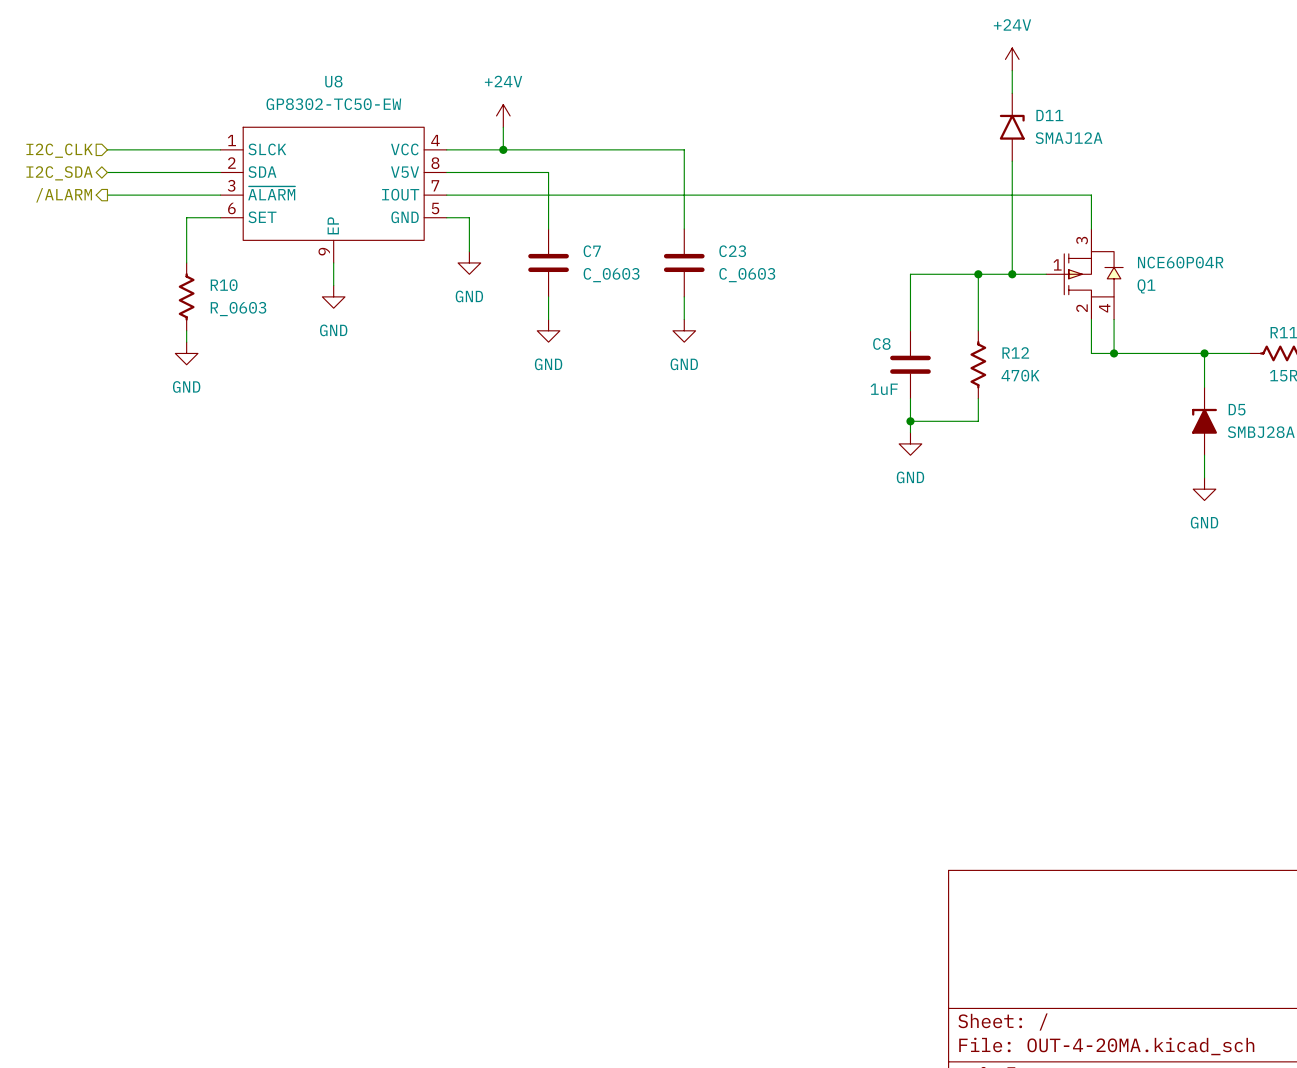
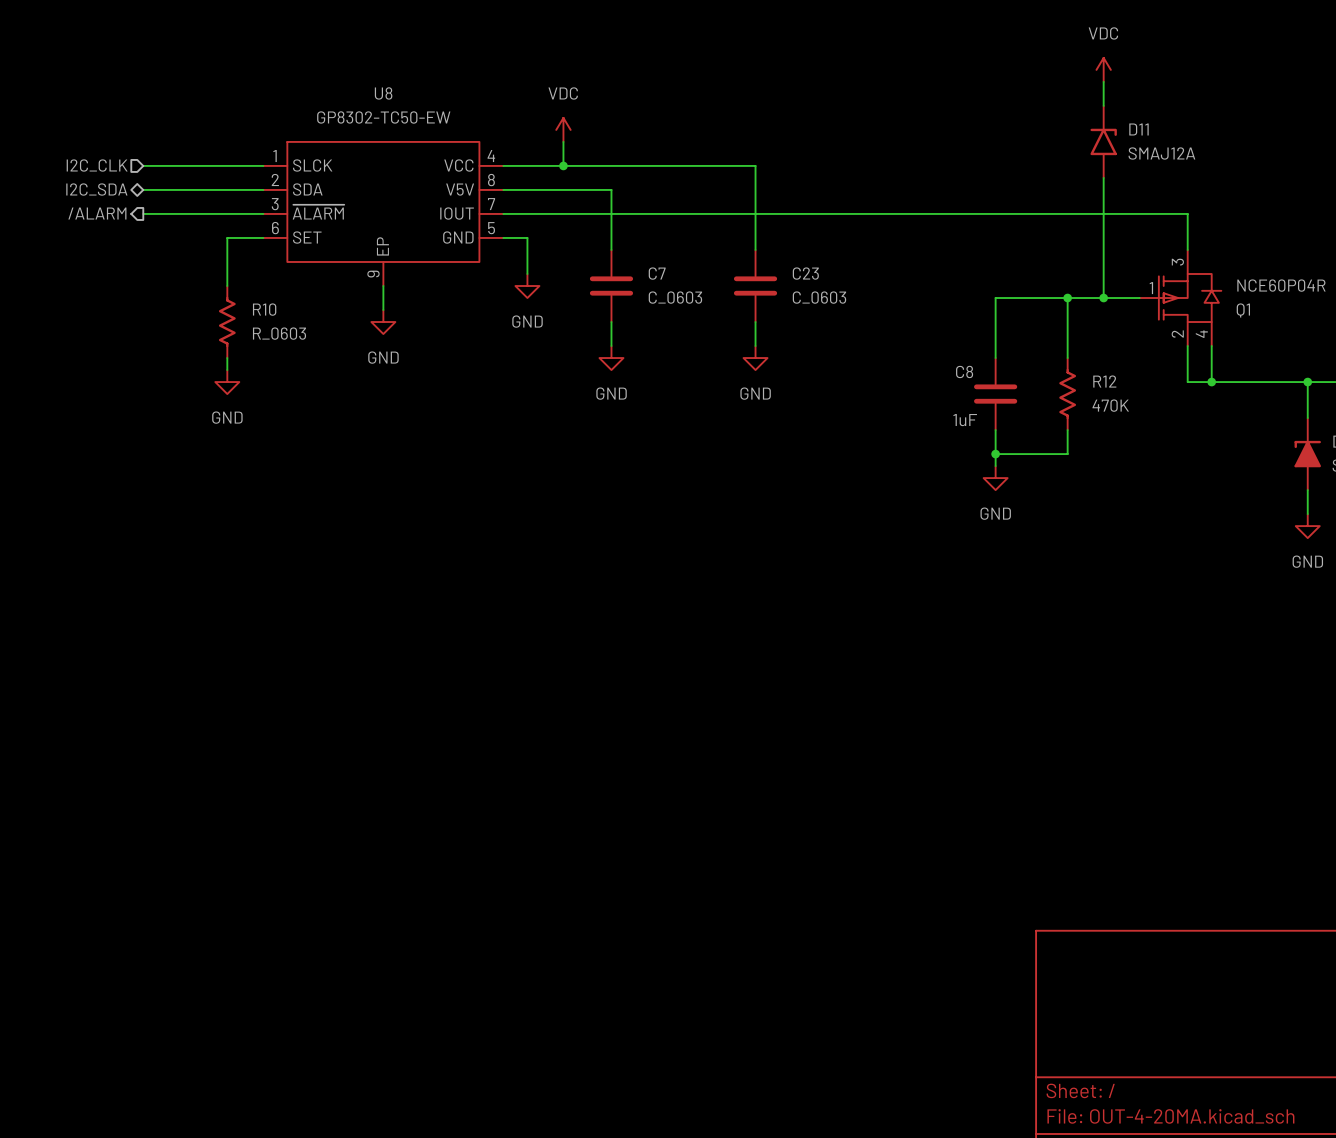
power symbol: +24V (1012, 59) -> VDC (1103, 69)
power symbol: +24V (503, 115) -> VDC (563, 129)

